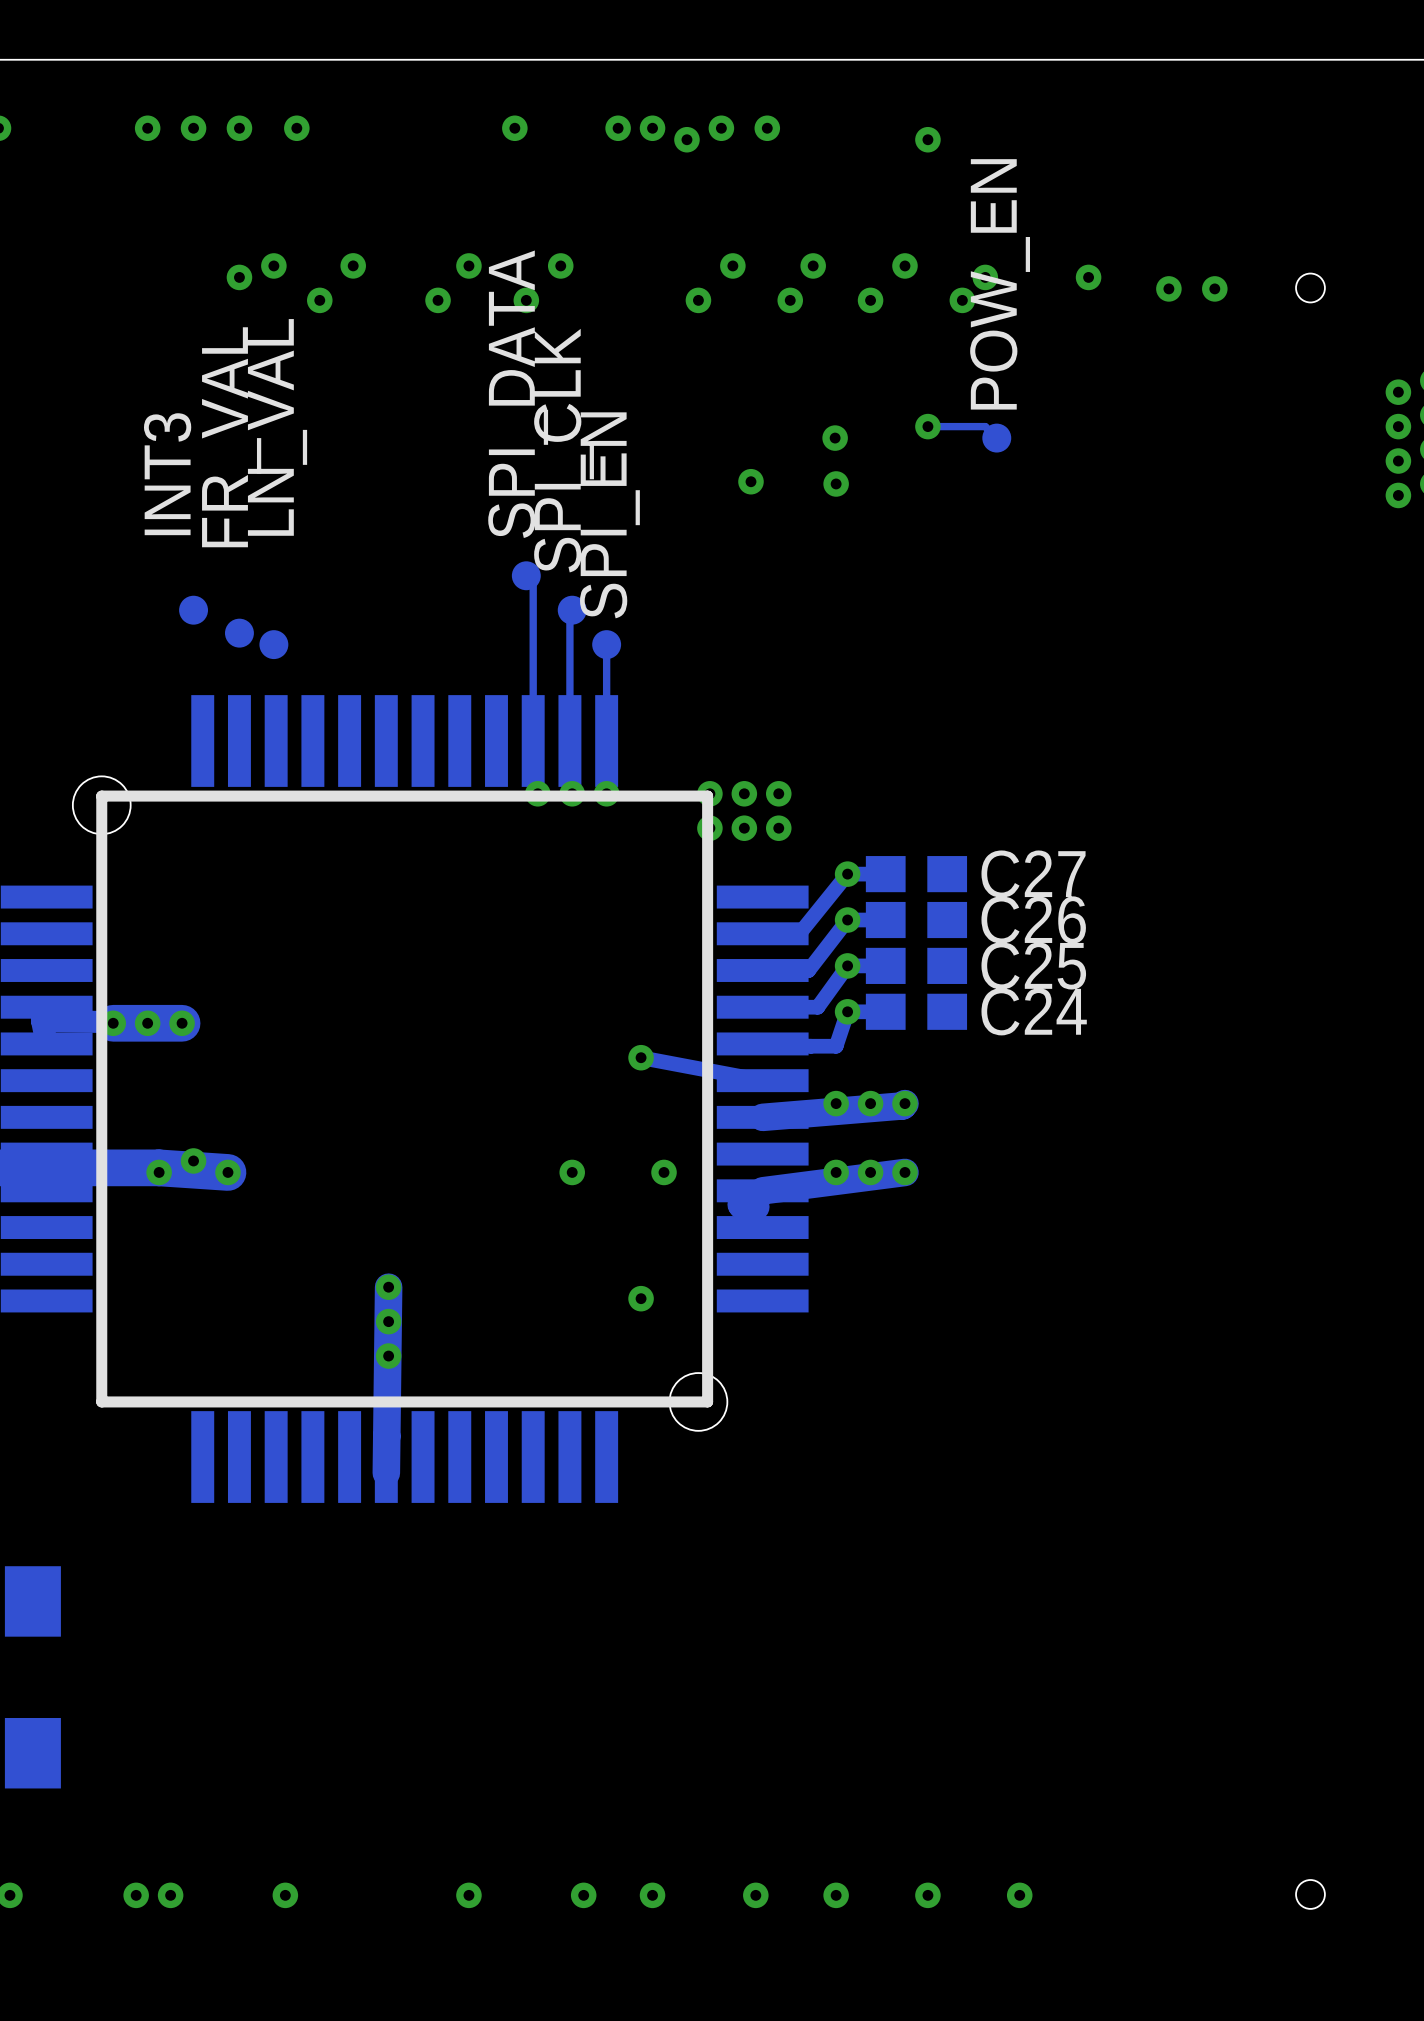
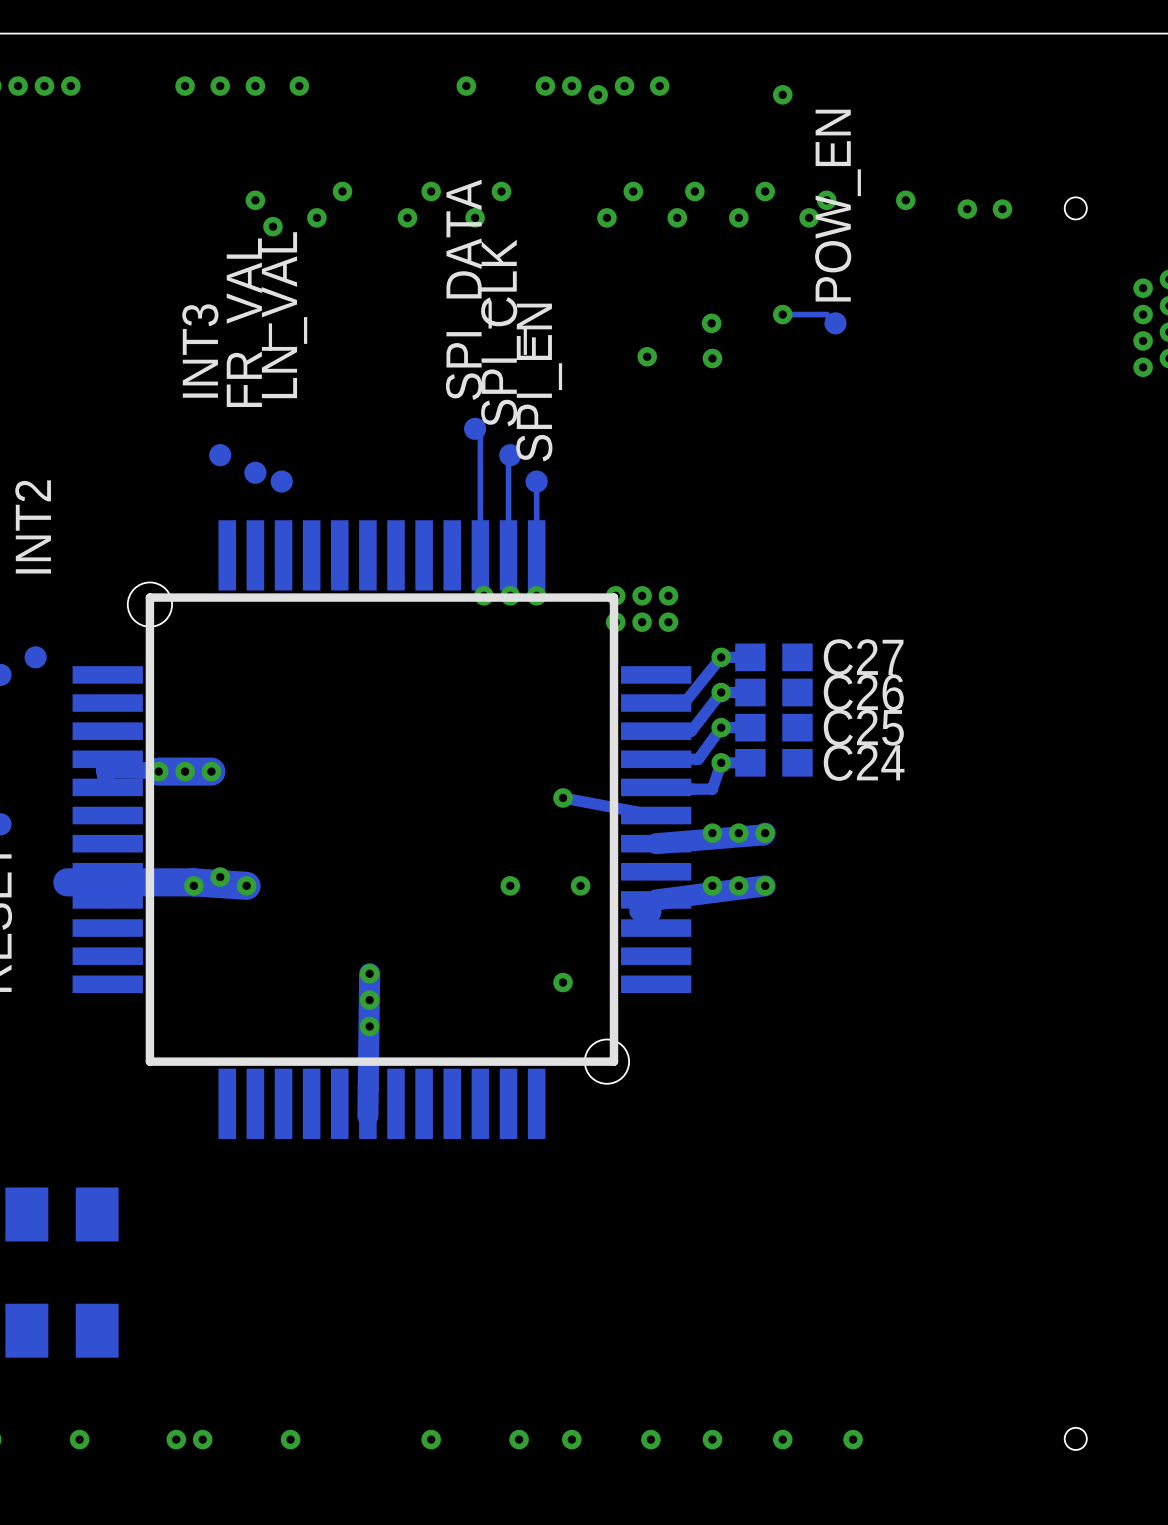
via position: (273, 265) -> (272, 226)

